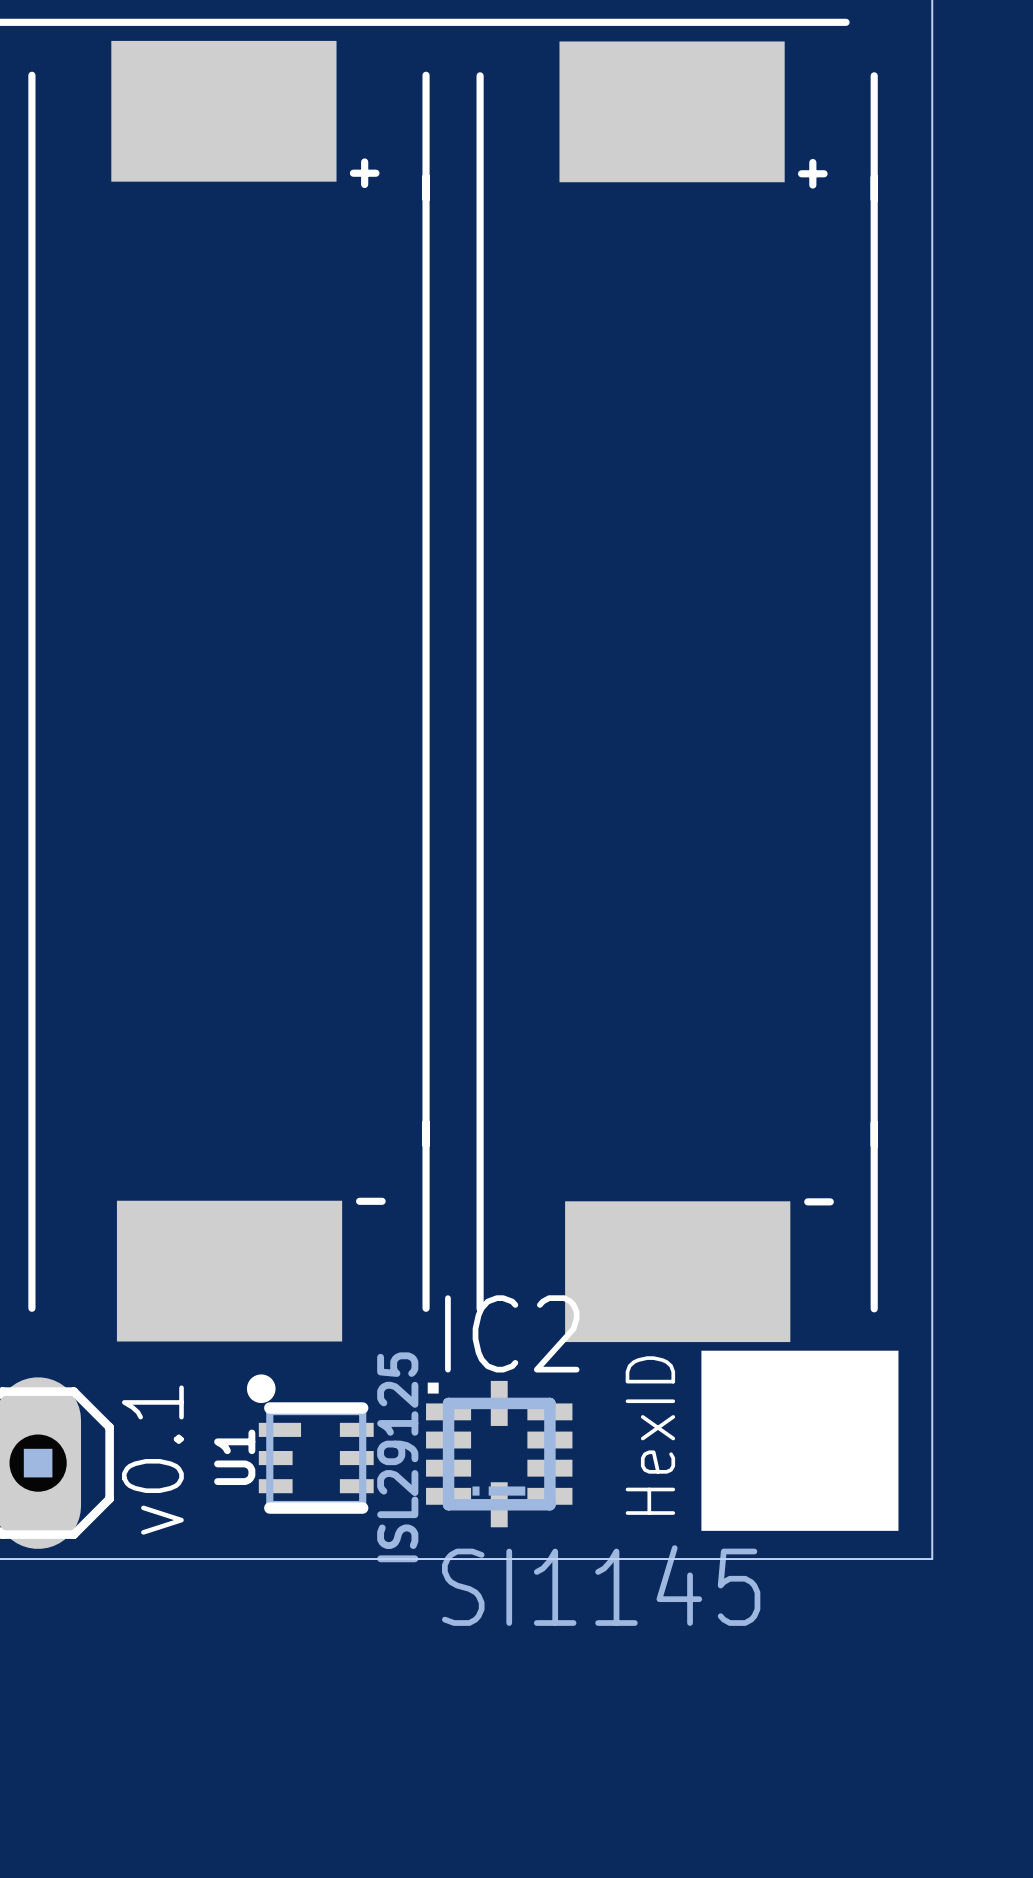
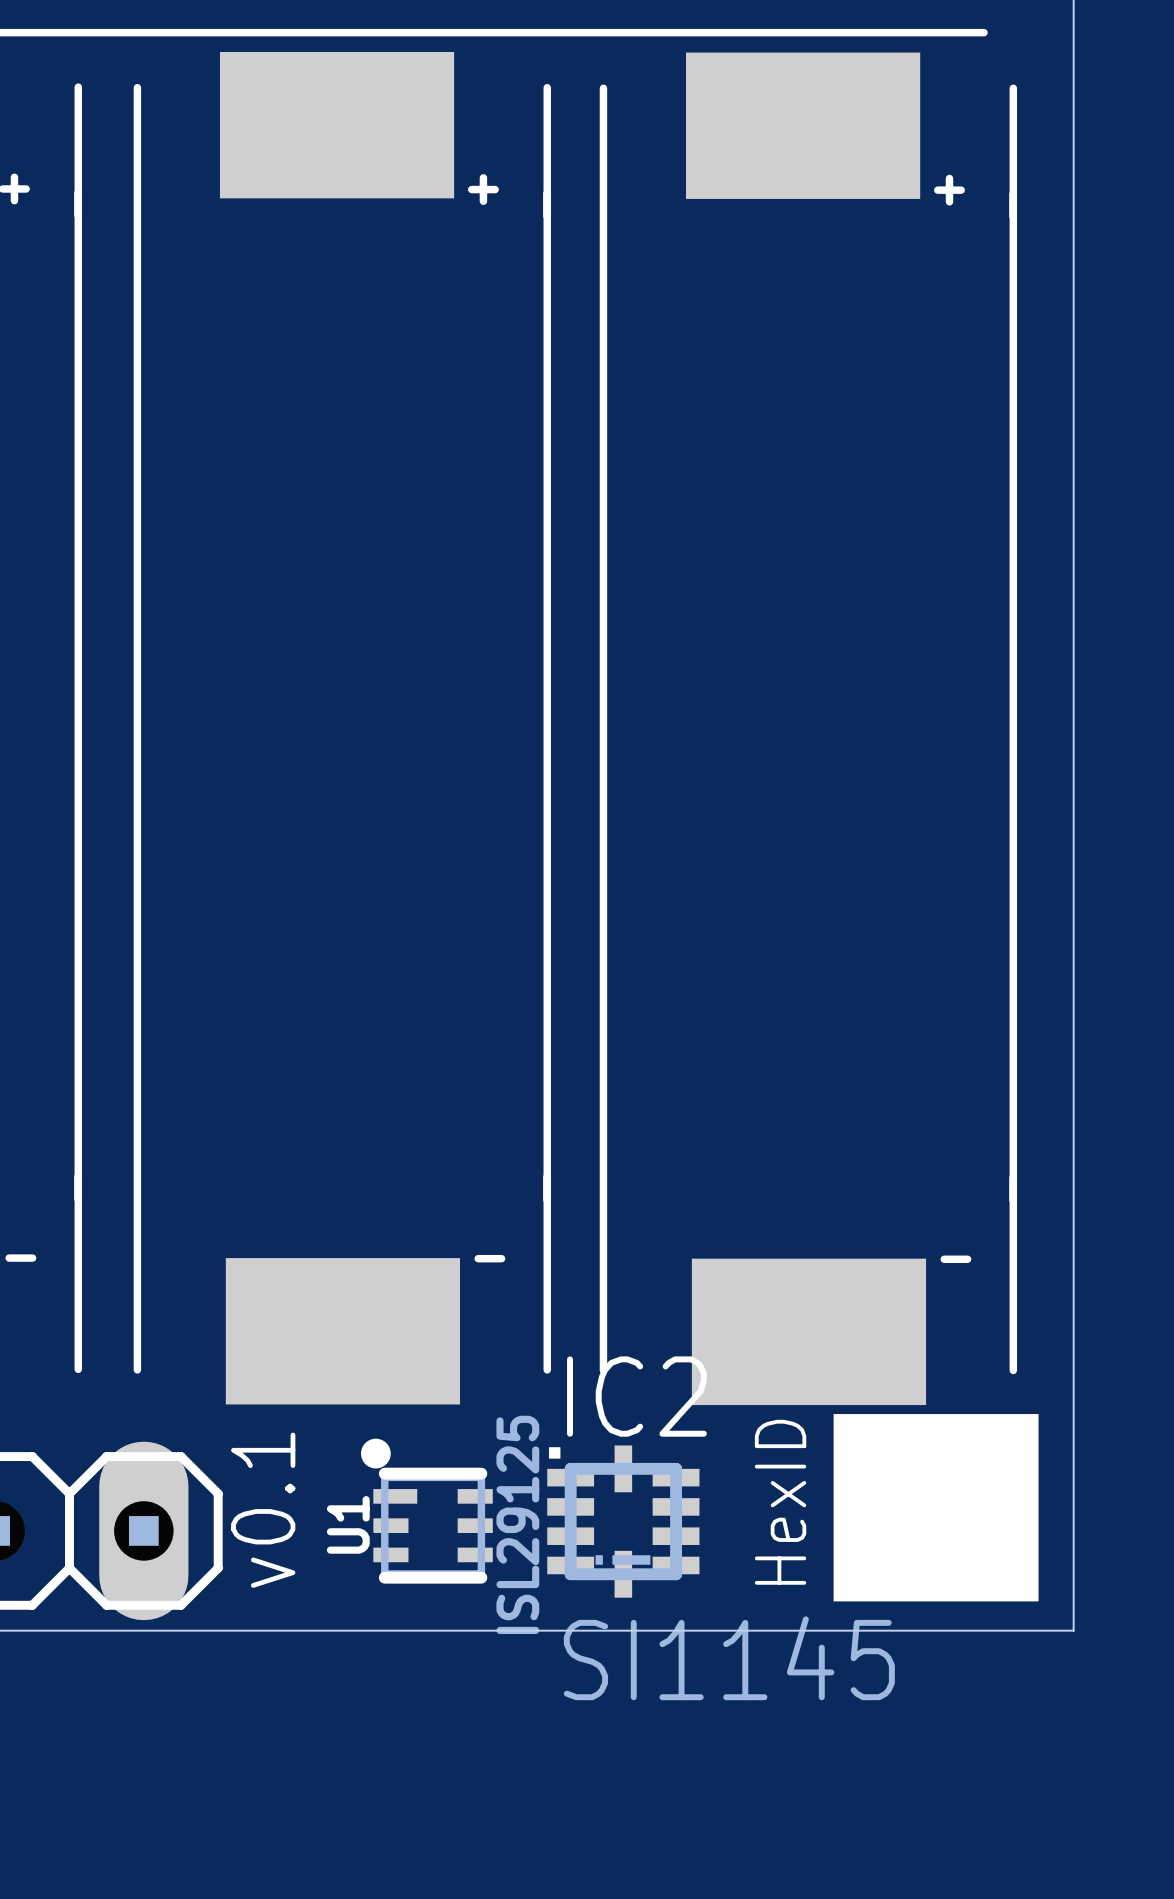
text position: v0.1 (152, 1460) -> v0.1 (263, 1510)

